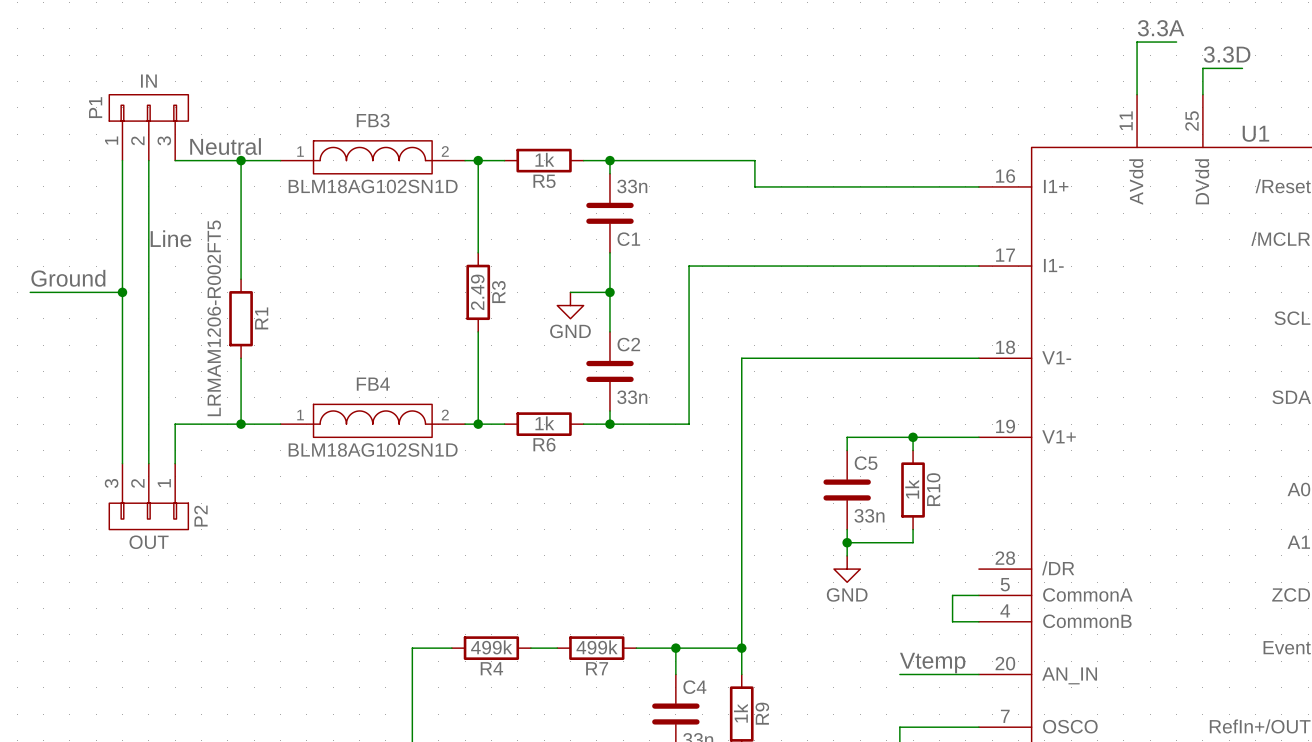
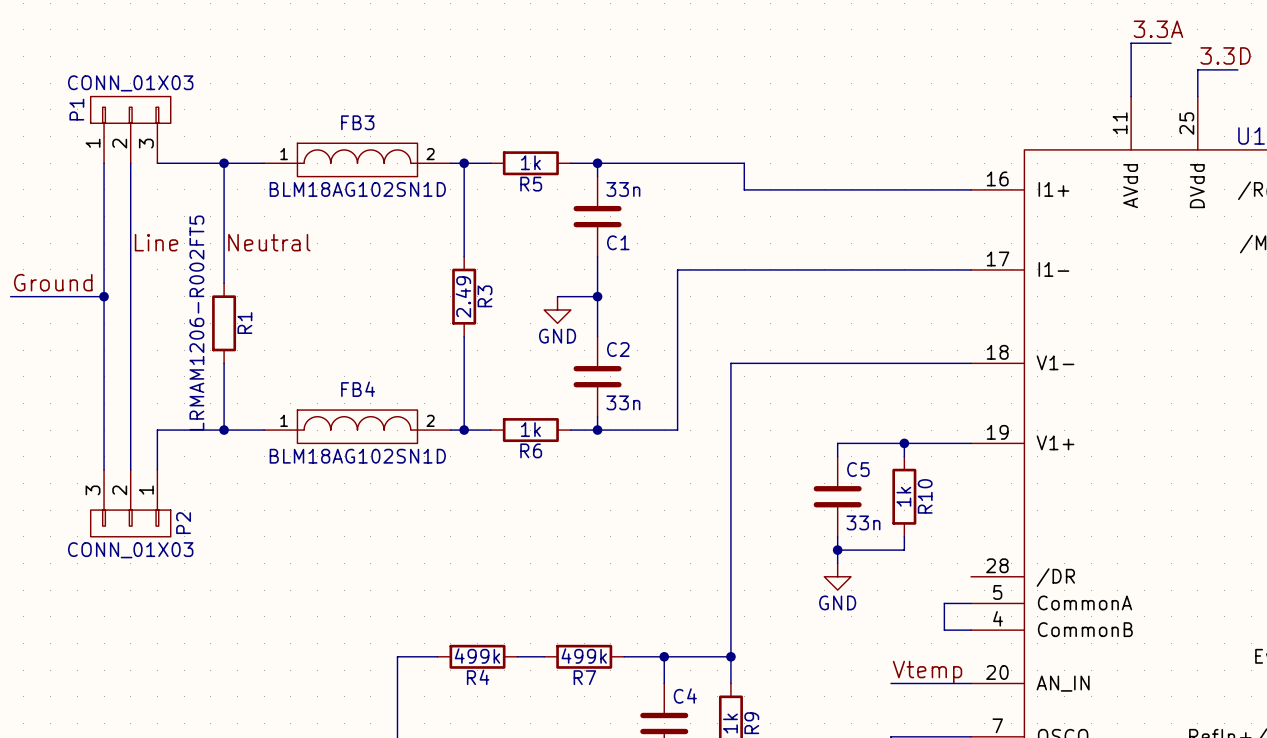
P1 value: IN (148, 81) -> CONN_01X03 (130, 83)
label position: Neutral (225, 146) -> Neutral (269, 242)
P2 value: OUT (149, 542) -> CONN_01X03 (130, 550)

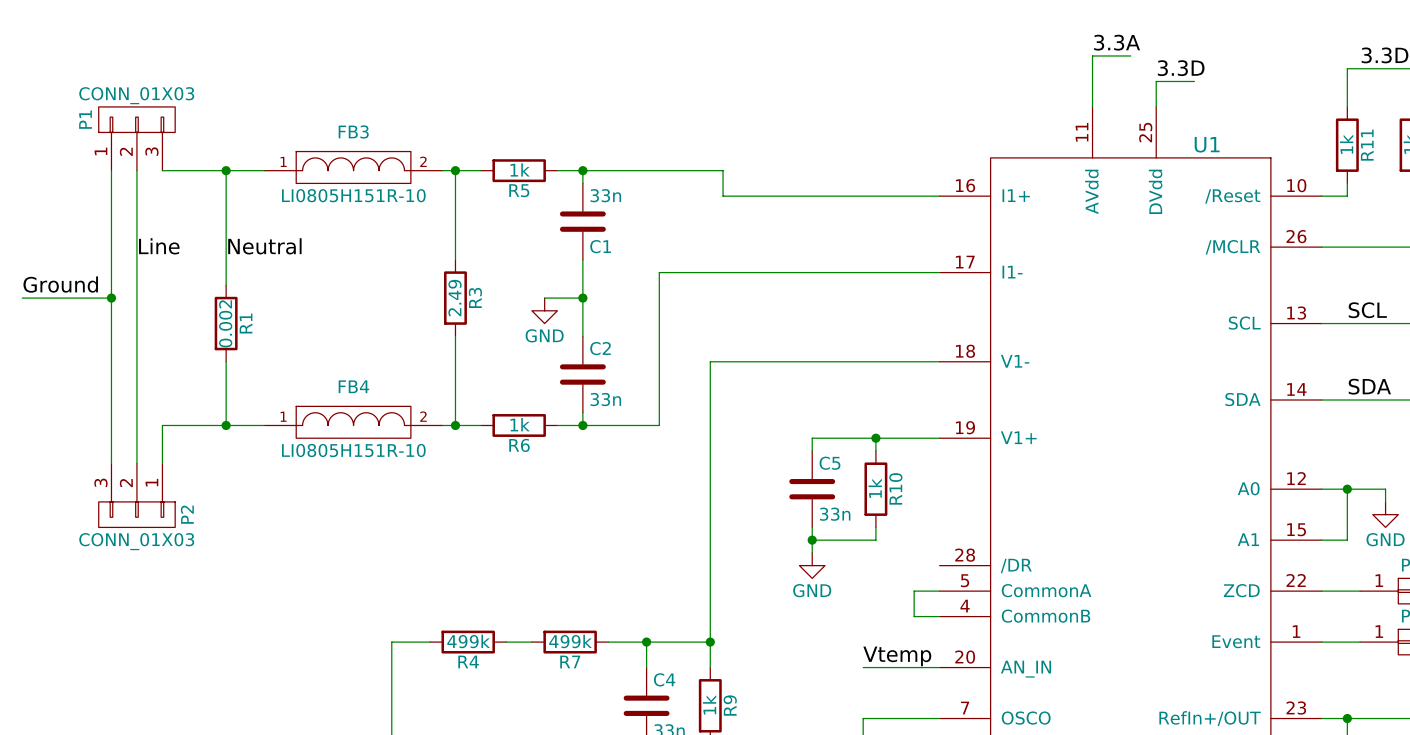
FB3 value: BLM18AG102SN1D (357, 189) -> LI0805H151R-10 (353, 195)
R1 value: LRMAM1206-R002FT5 (196, 323) -> 0.002 (225, 323)
FB4 value: BLM18AG102SN1D (357, 456) -> LI0805H151R-10 (353, 450)

